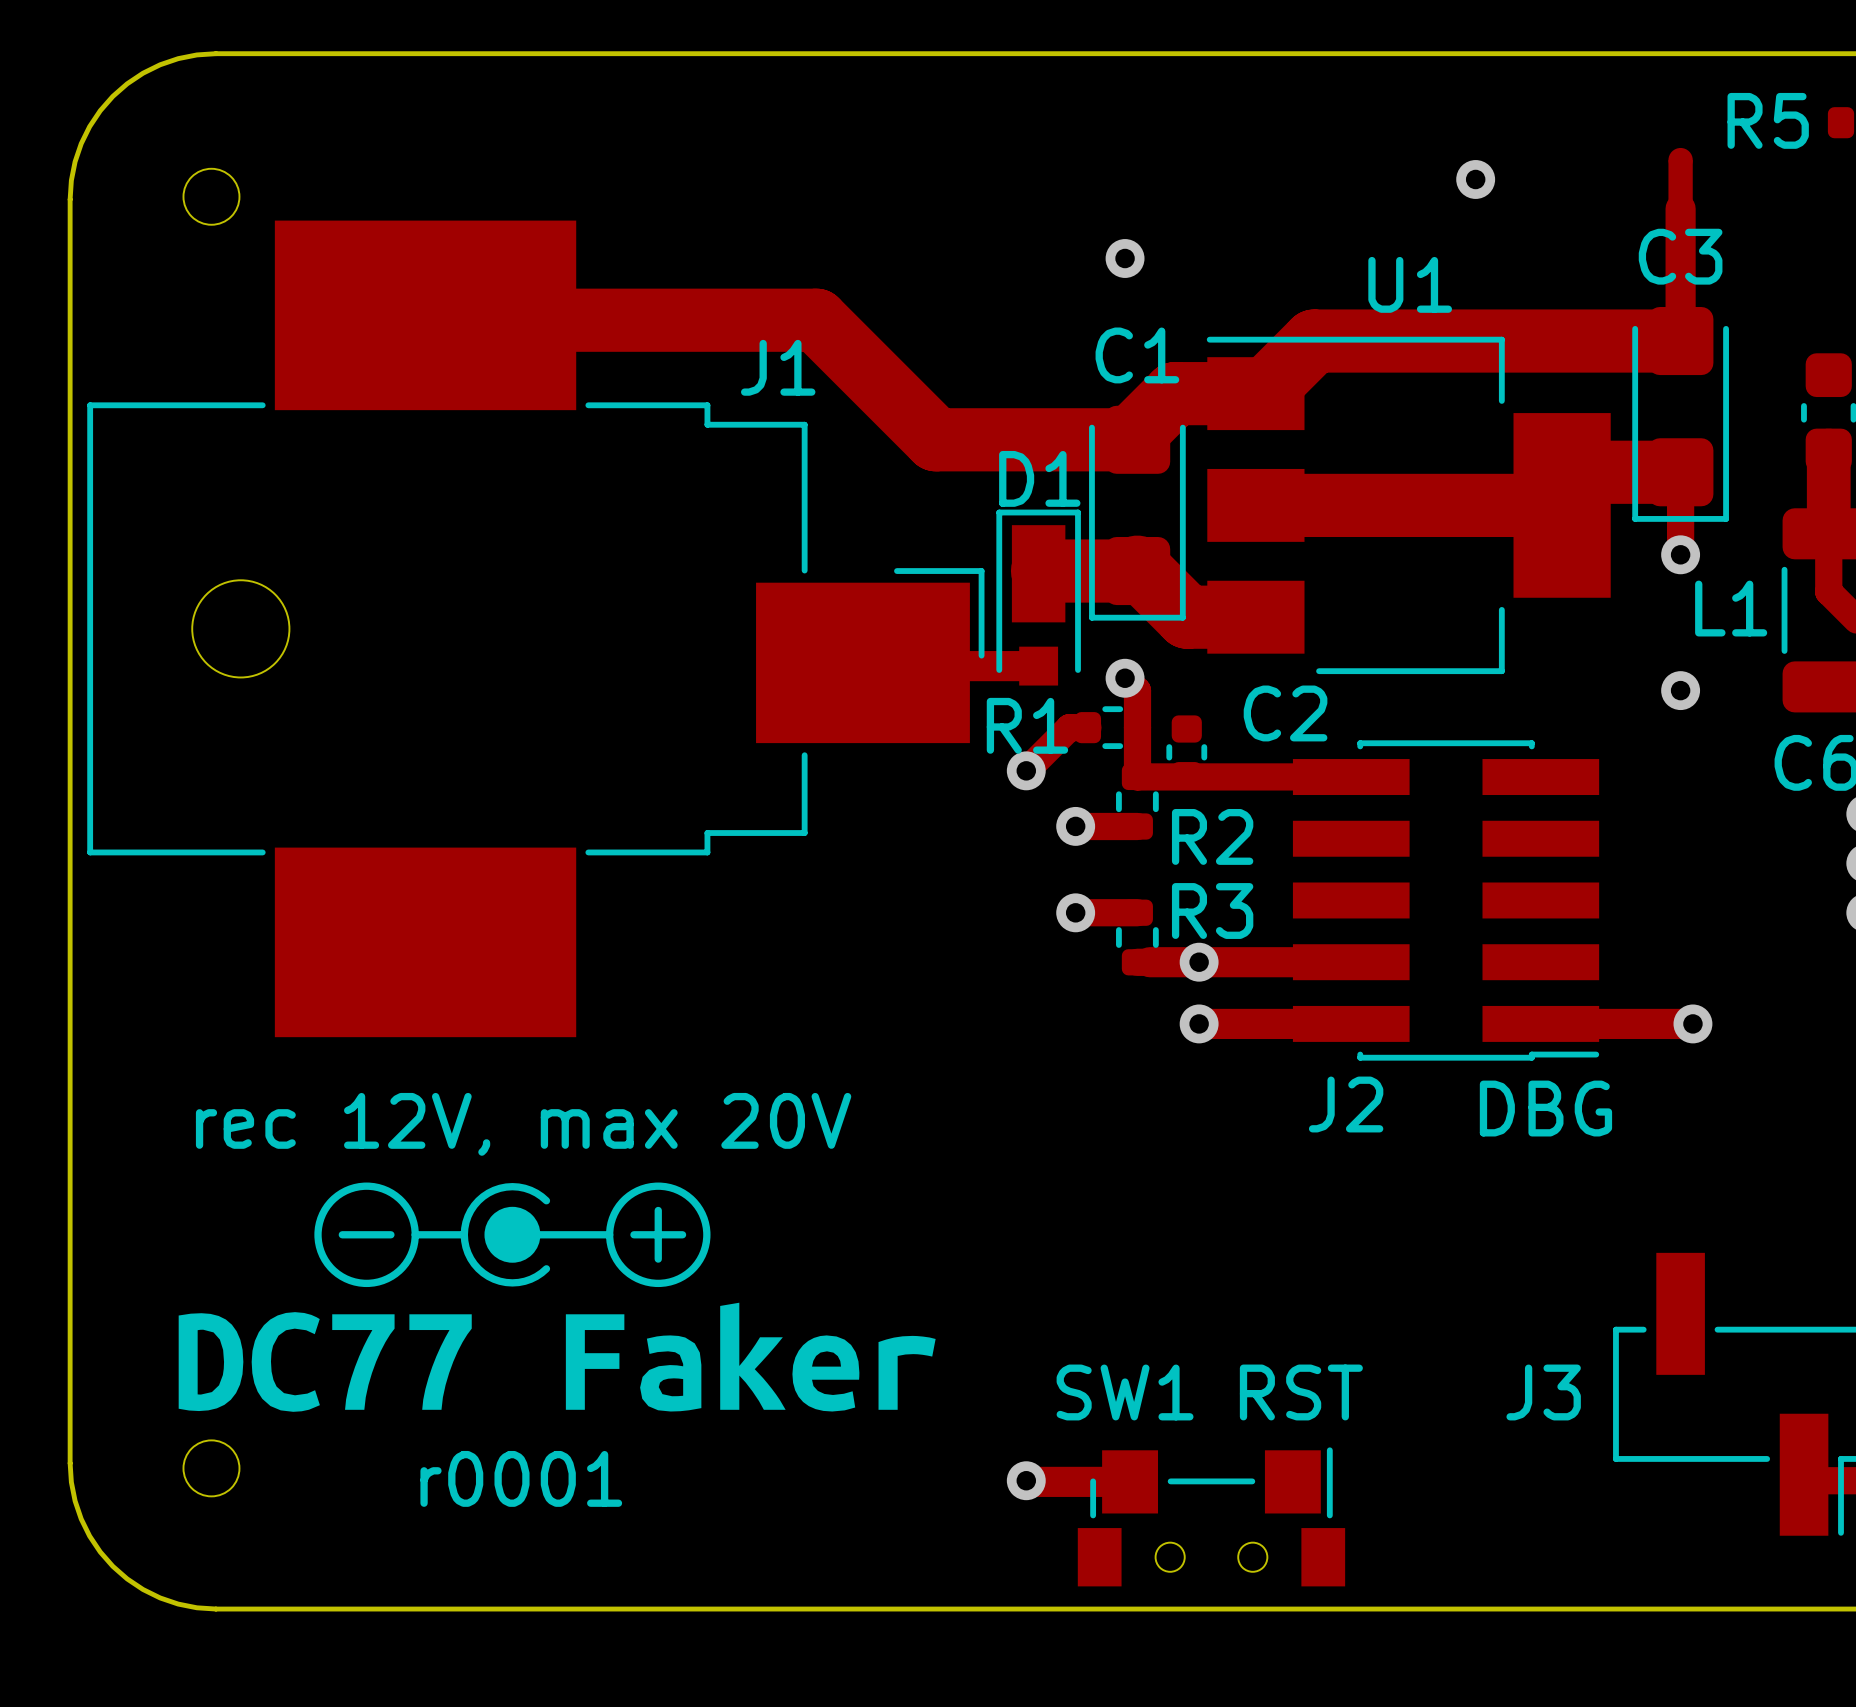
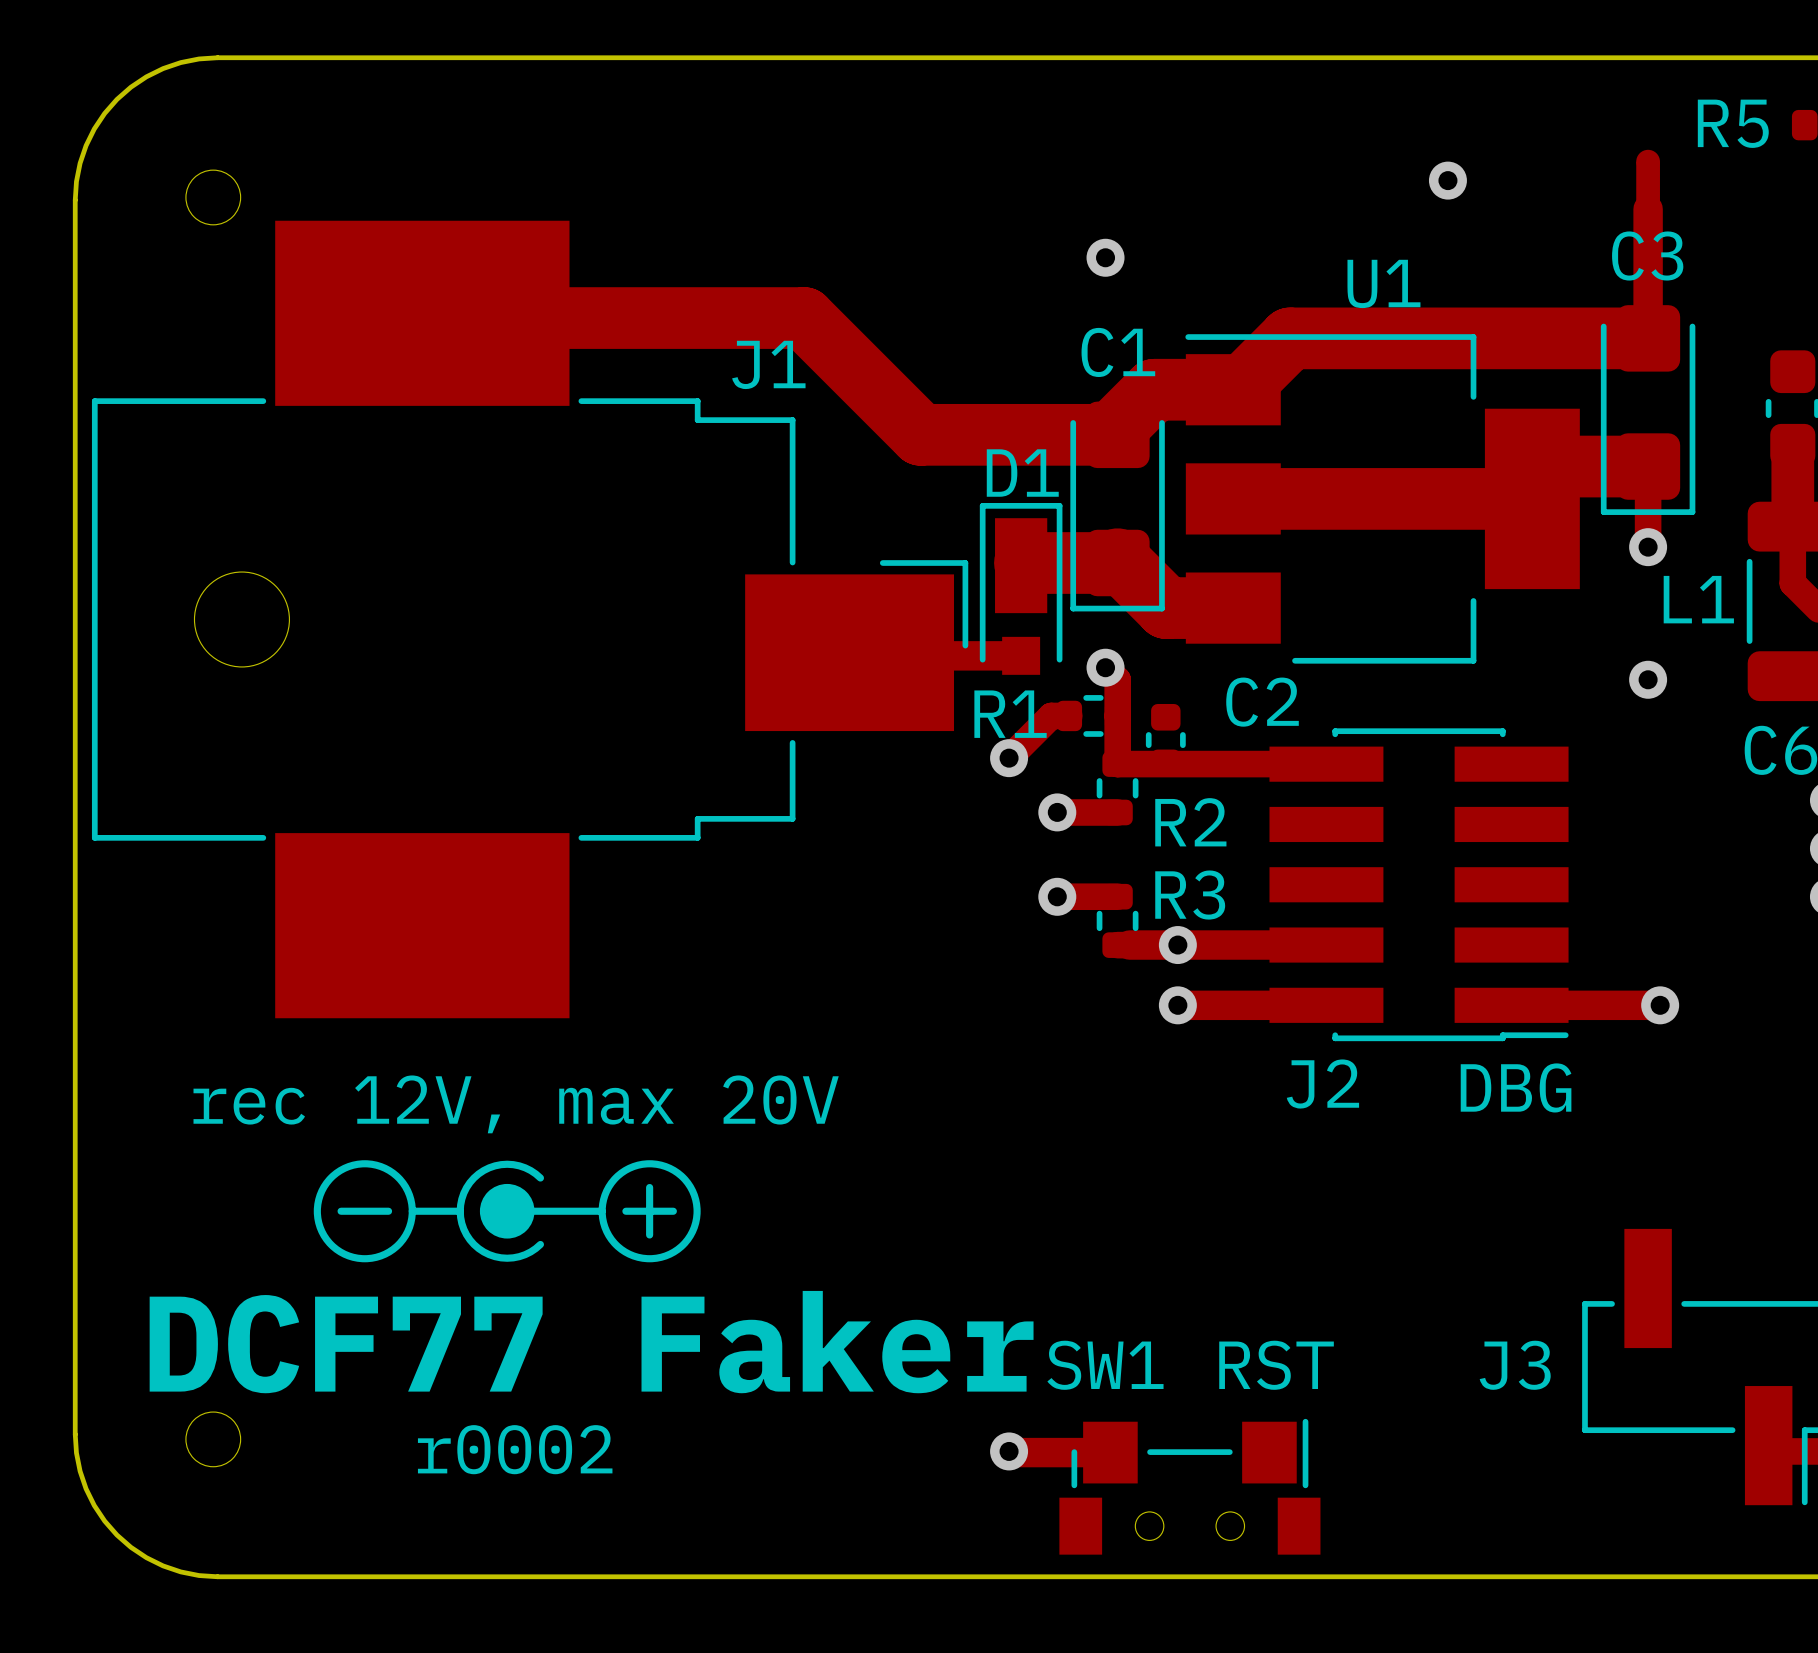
drawing: [178, 1302, 936, 1412] -> none
text: none -> DCF77 Faker (591, 1342)
text: r0001 (521, 1478) -> r0002 (515, 1449)

